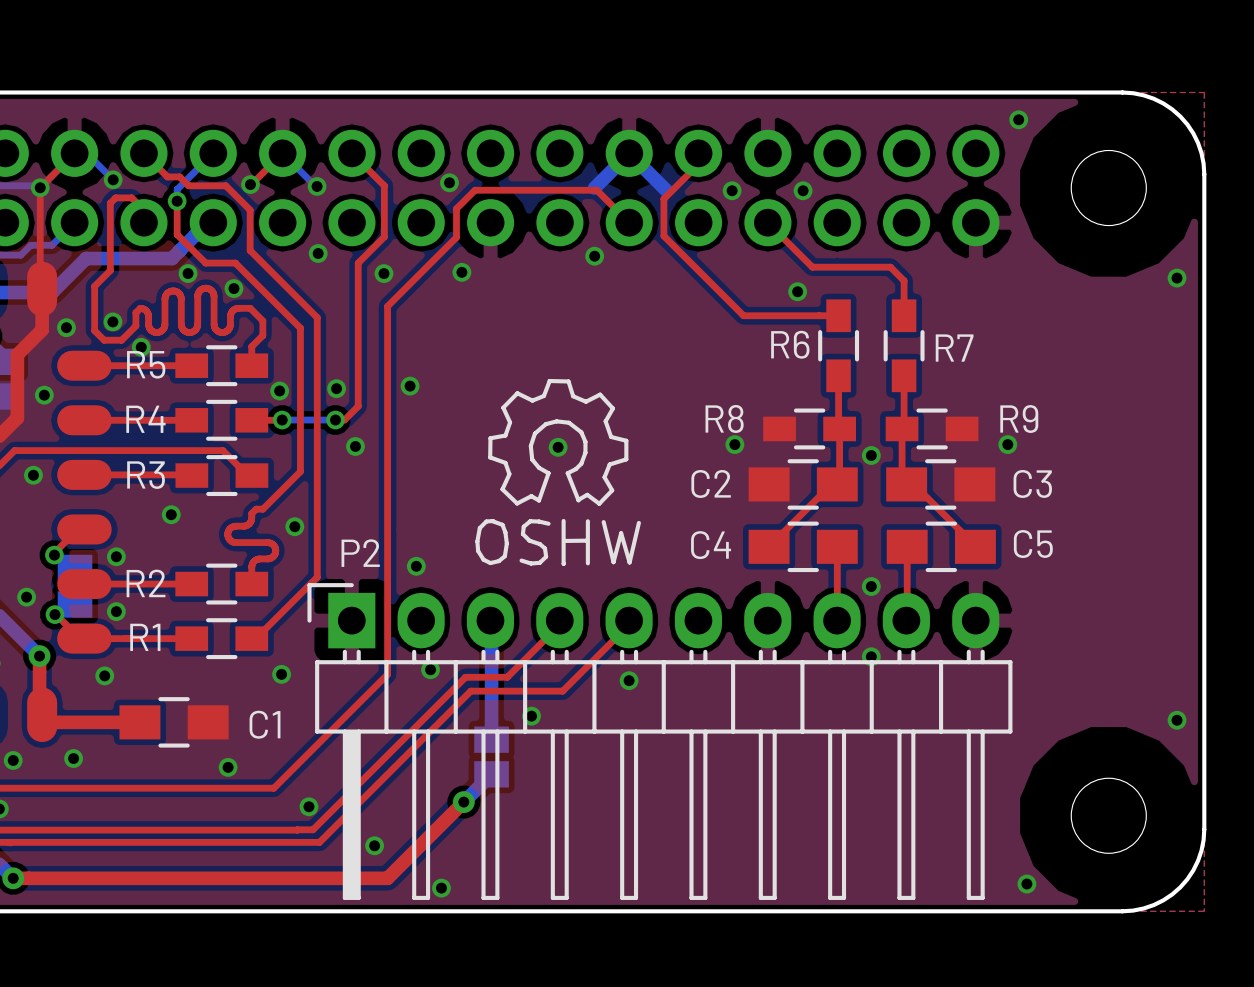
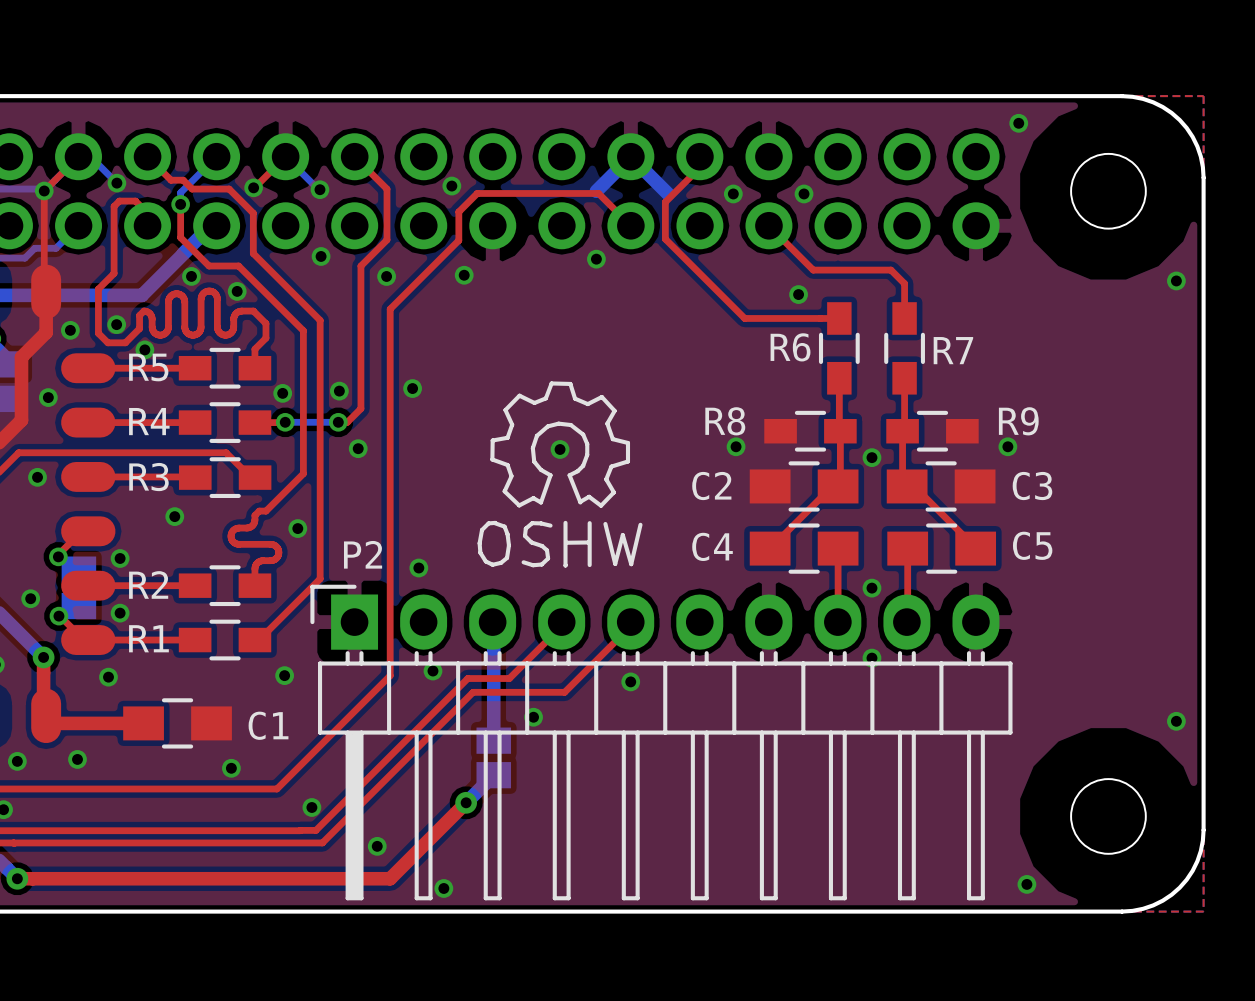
bottom track: (172, 258) (86, 258) (52, 292) -> (175, 261) (141, 295) (56, 295)

